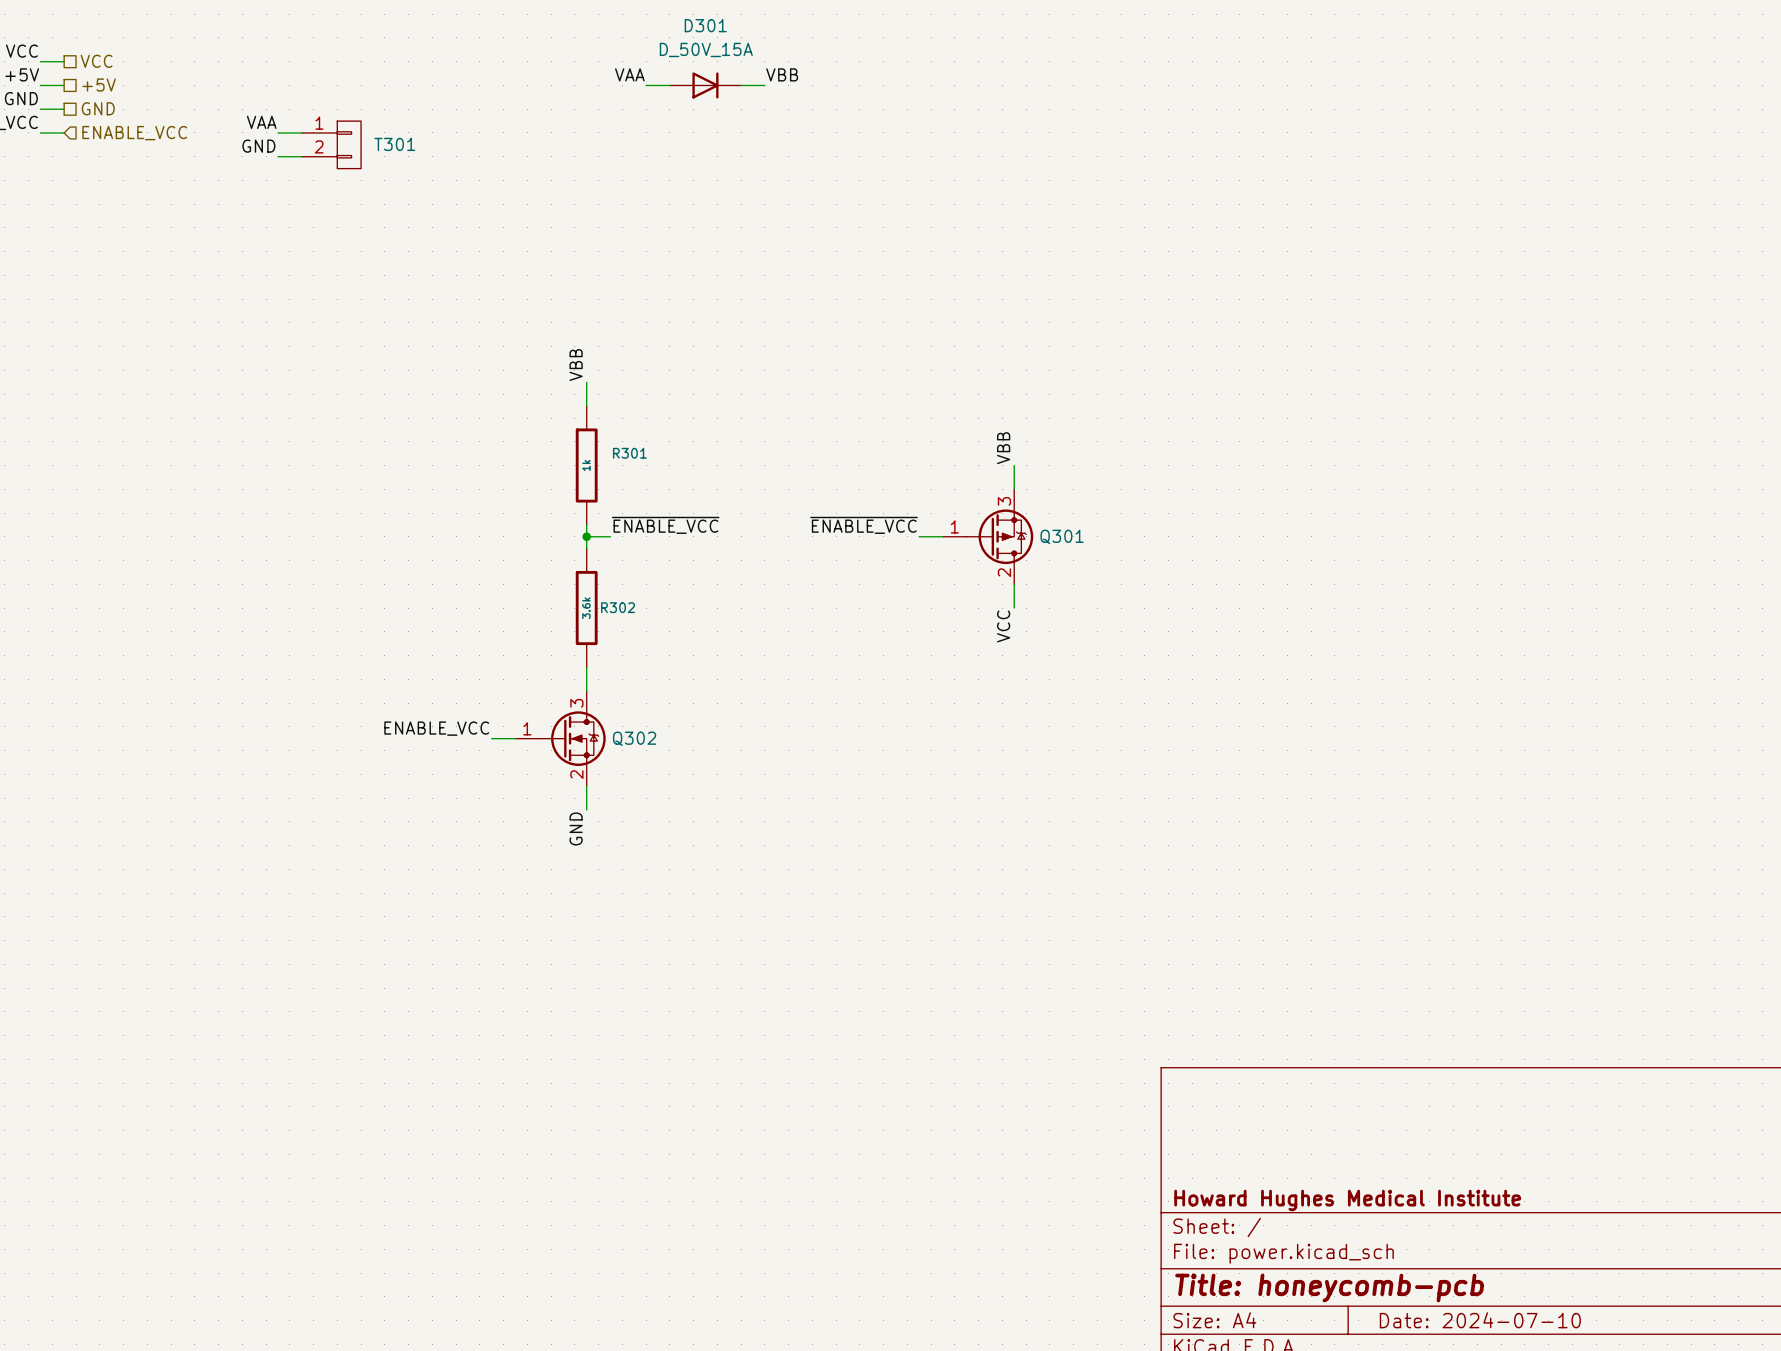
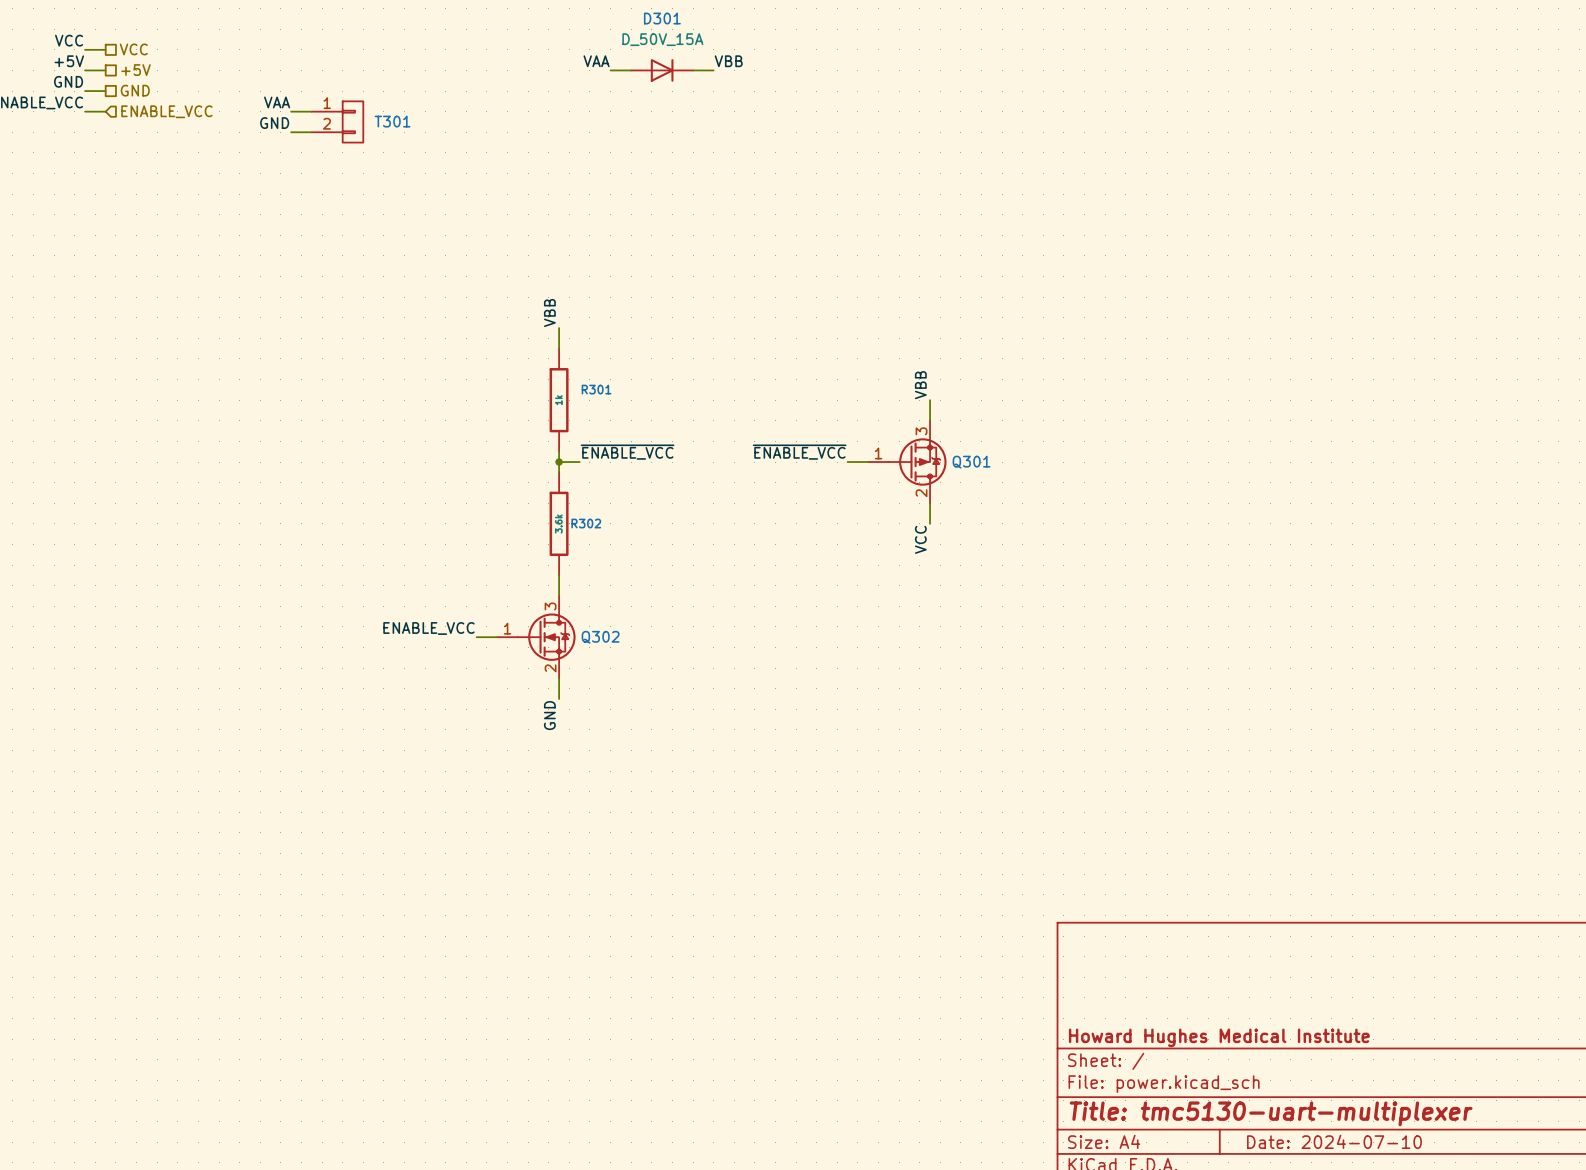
title block: Title: honeycomb-pcb (1329, 1288) -> Title: tmc5130-uart-multiplexer (1271, 1113)

